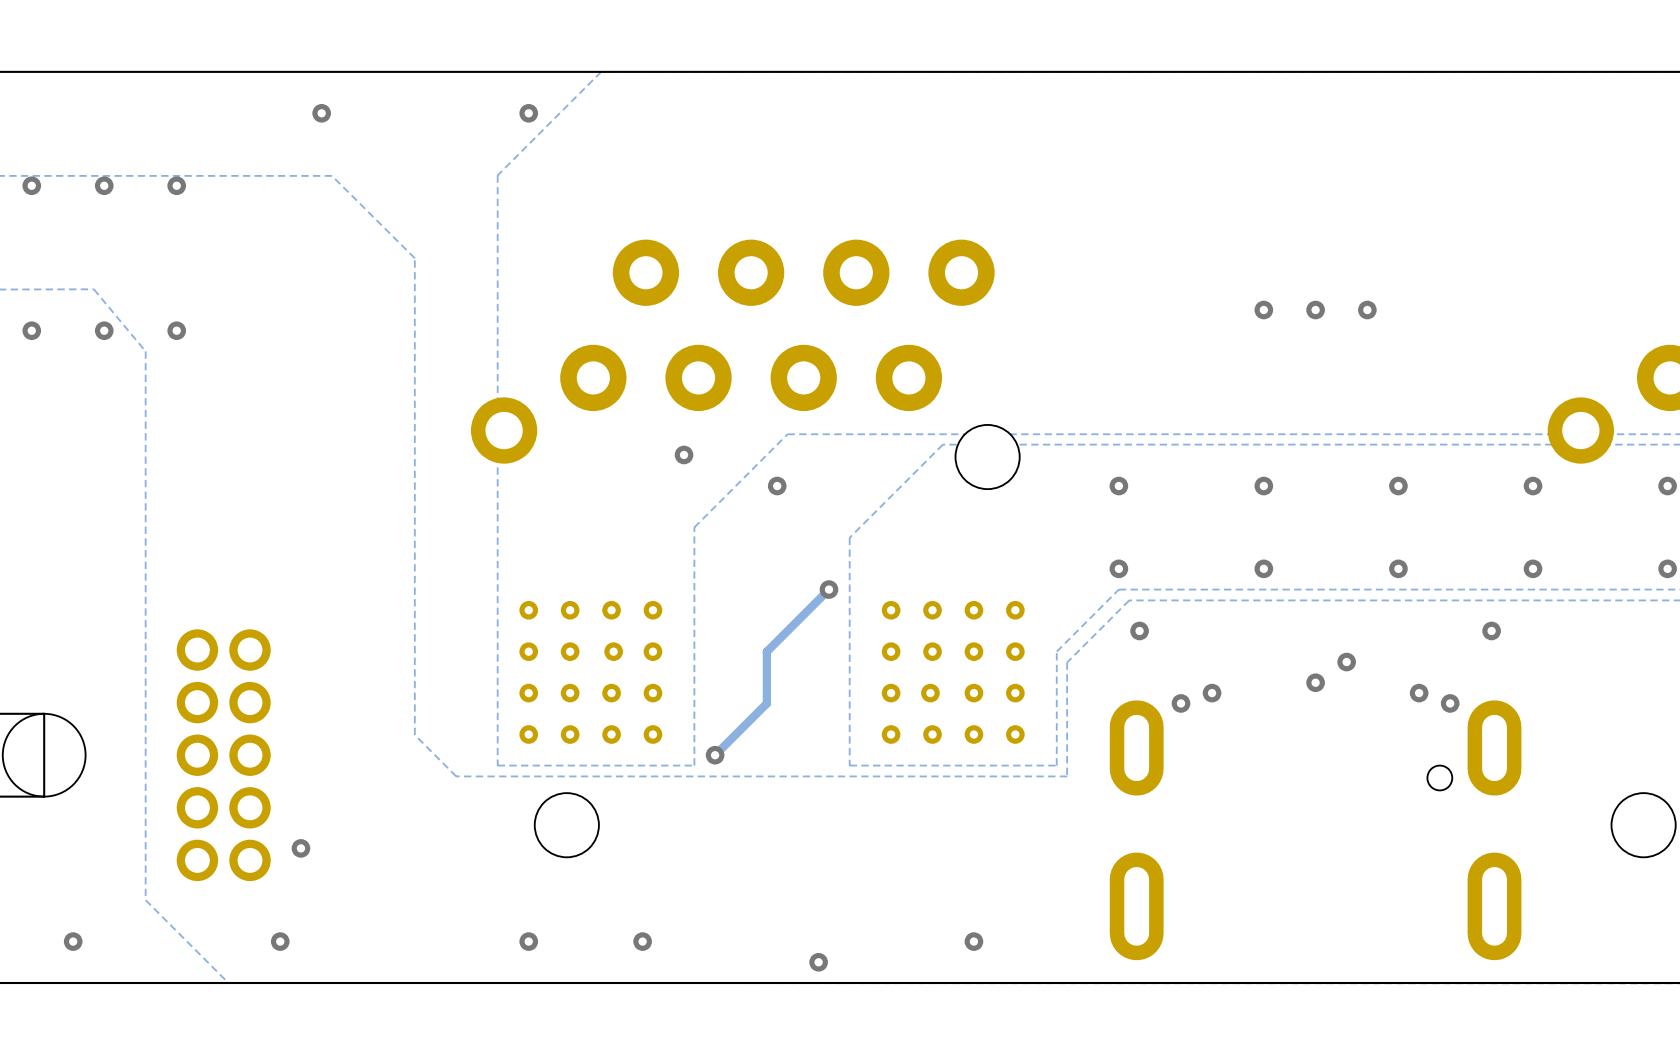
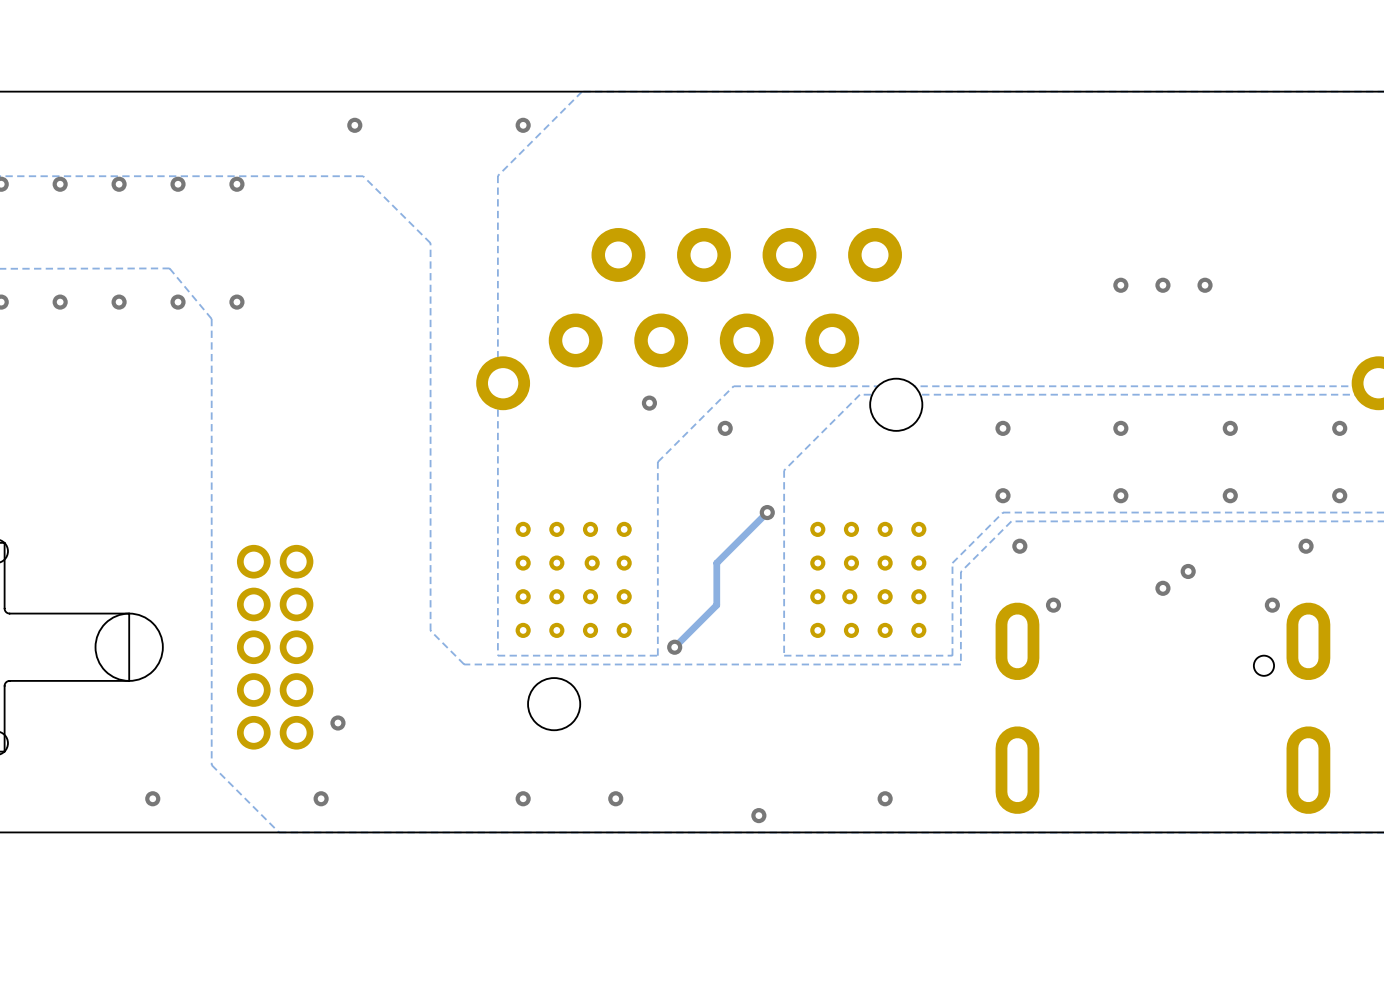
via: (1212, 693) -> none
via: (1419, 693) -> none

